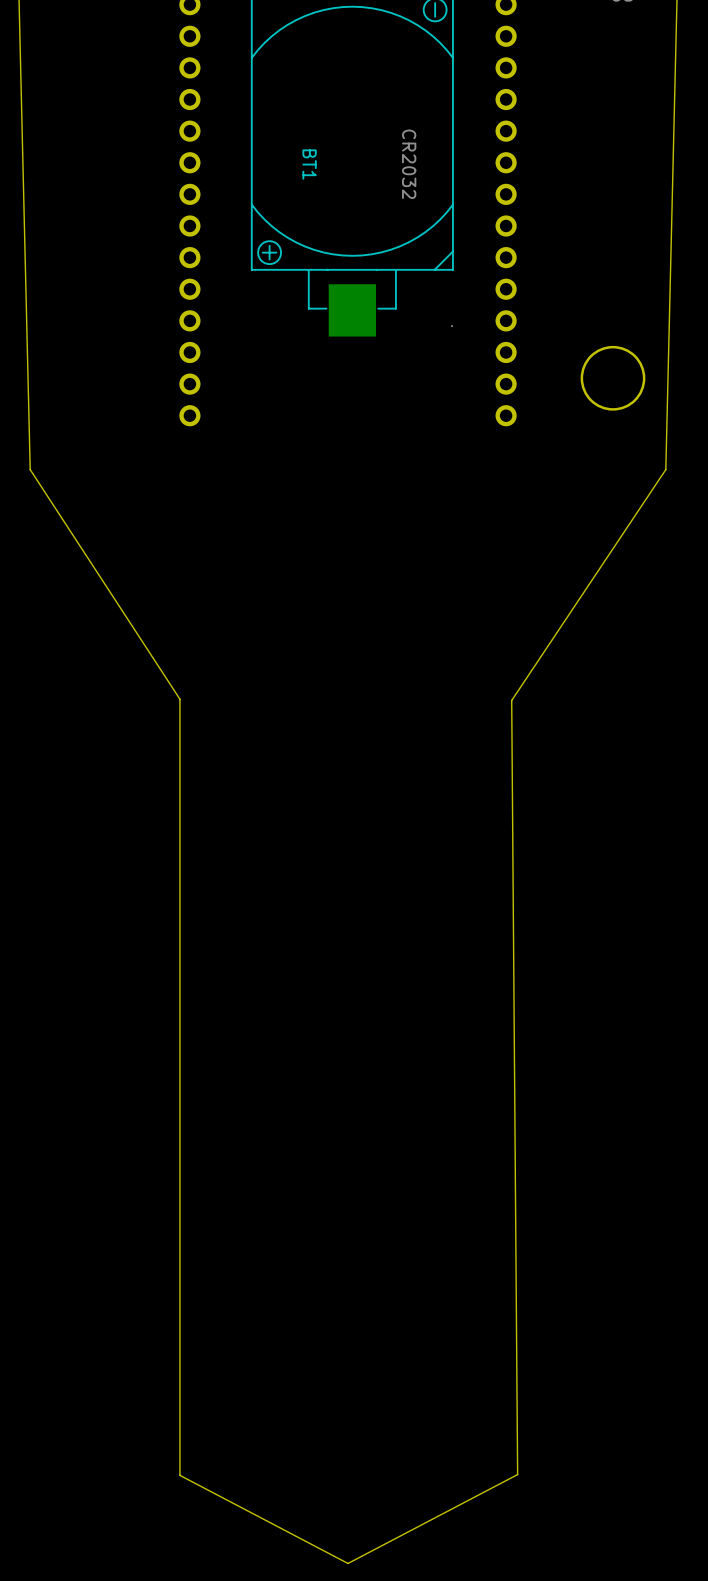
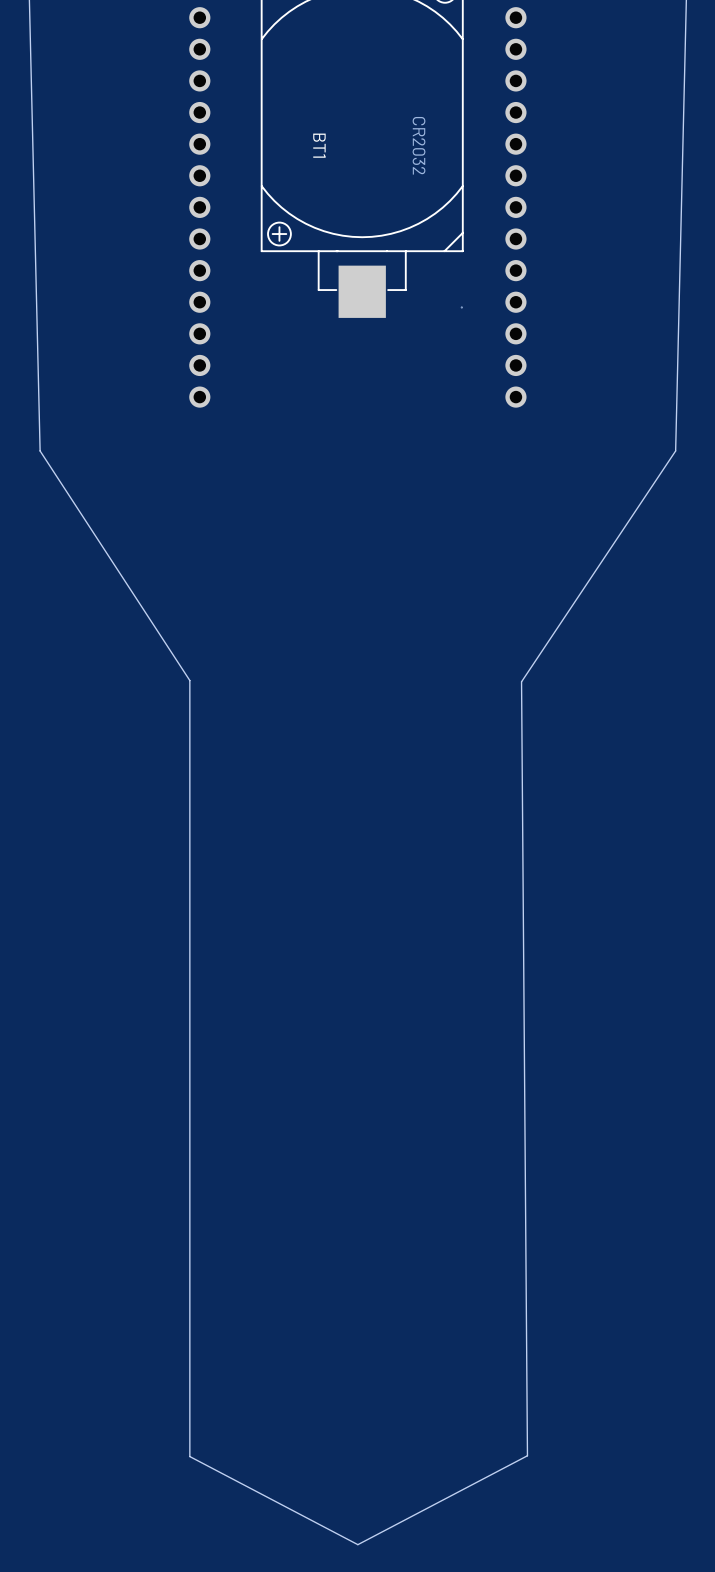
round board edge: [580, 345, 646, 411] -> none

